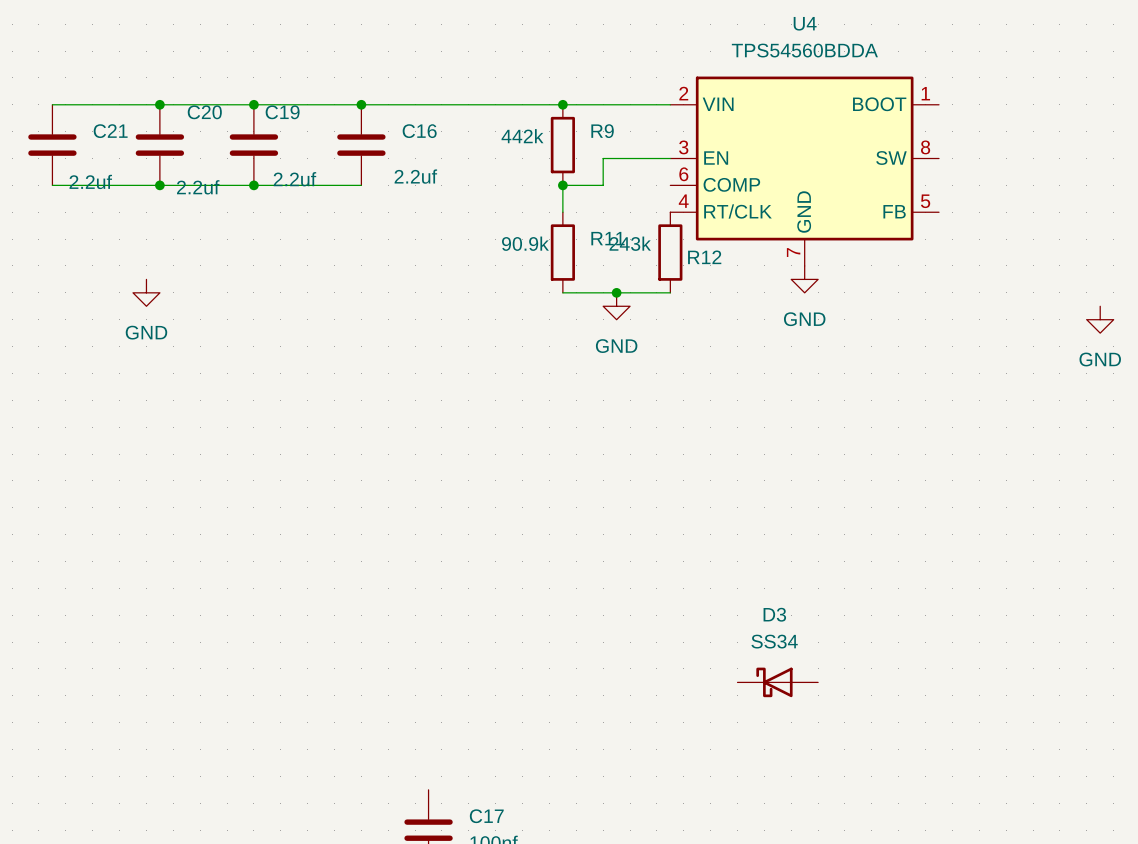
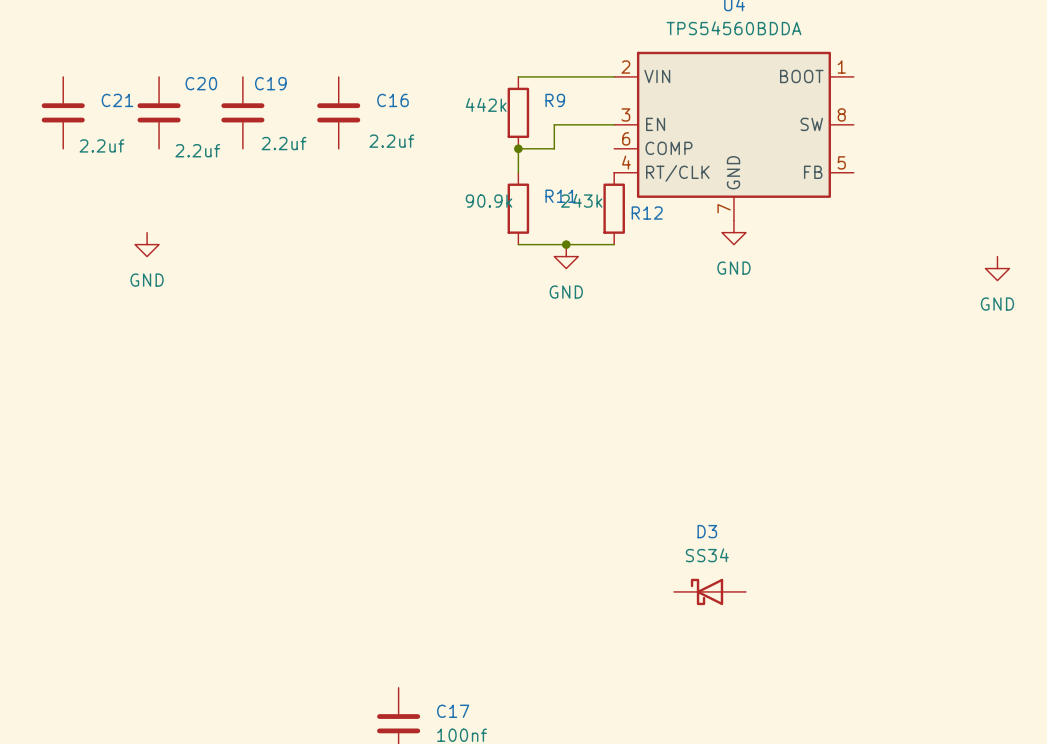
wire: (52, 104) (562, 104) -> none
junction: (159, 104) -> none
junction: (253, 104) -> none
junction: (361, 104) -> none
junction: (562, 104) -> none
wire: (52, 185) (361, 185) -> none
junction: (159, 185) -> none
junction: (253, 185) -> none

